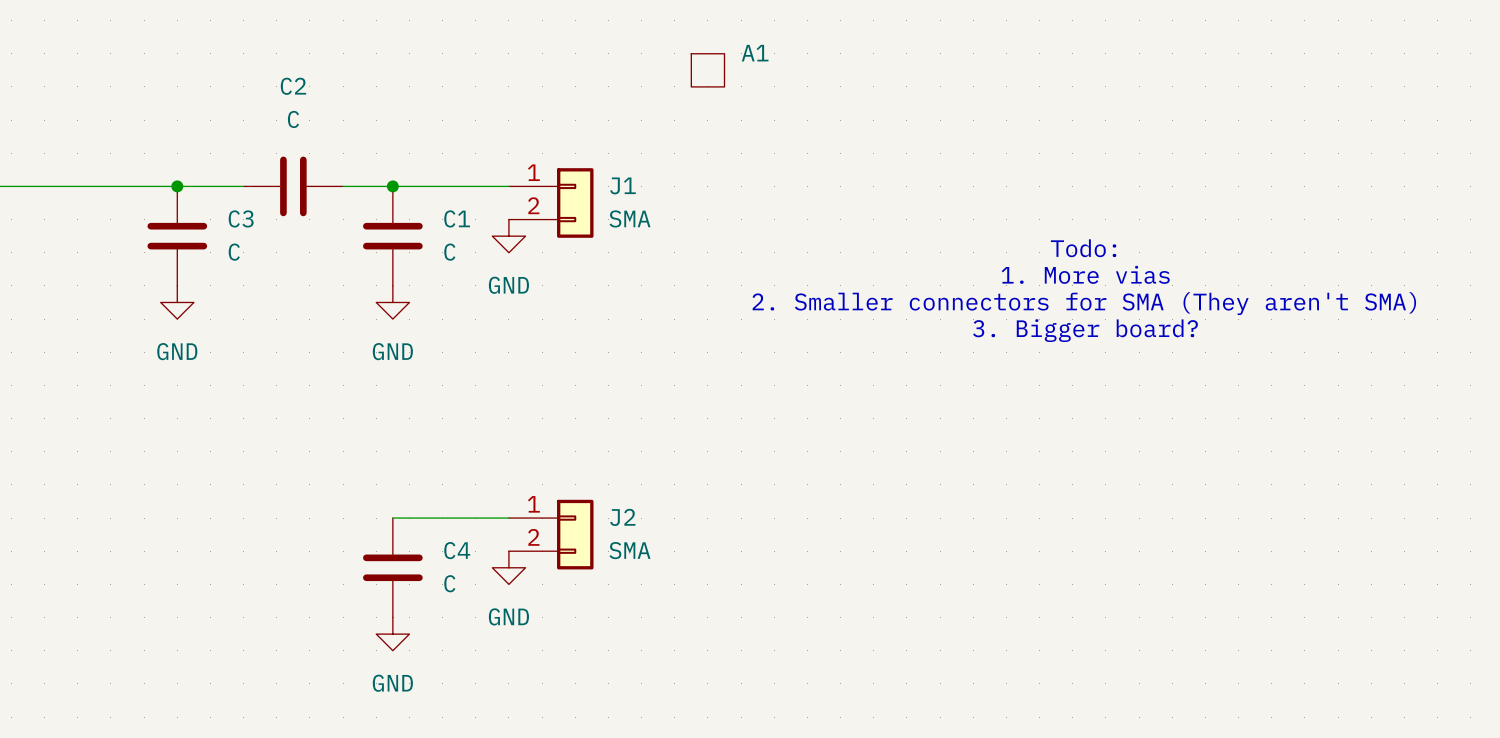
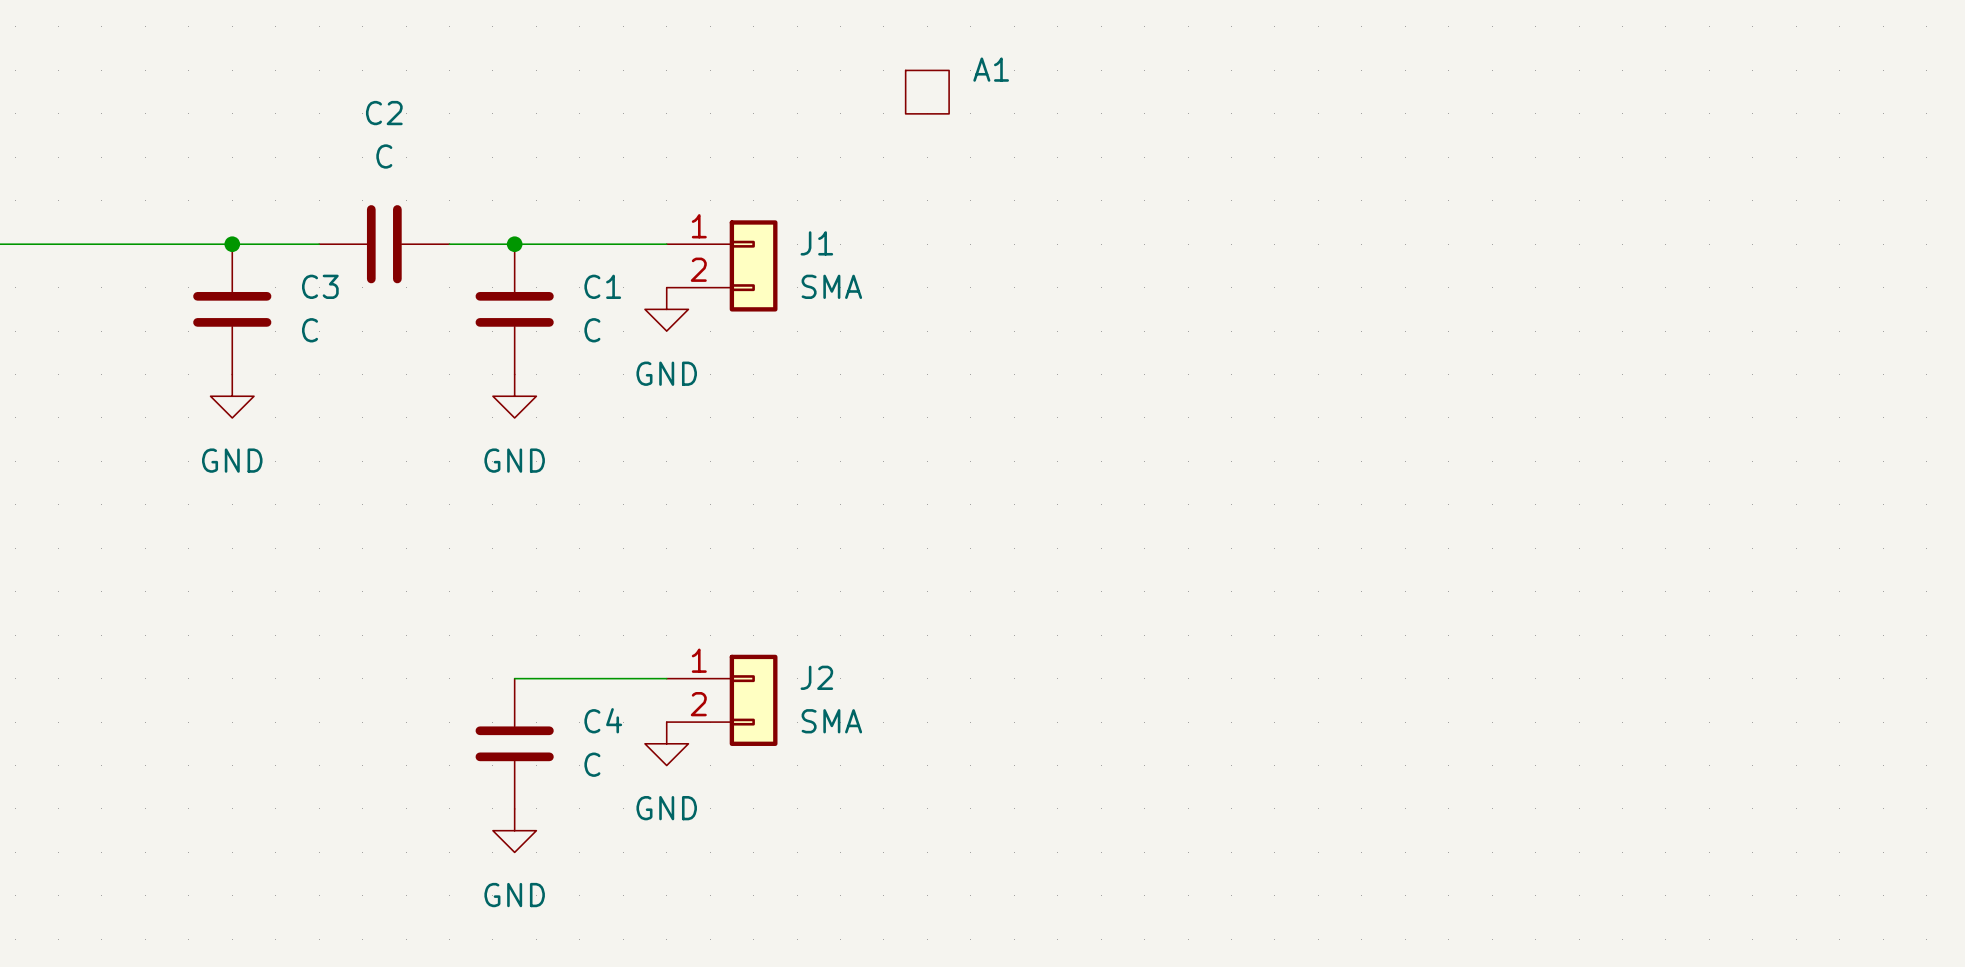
text: Todo: (1083, 248) -> none
text: 1. More vias (1085, 274) -> none
text: 2. Smaller connectors for SMA (They aren't SMA) (1084, 303) -> none
text: 3. Bigger board? (1085, 330) -> none

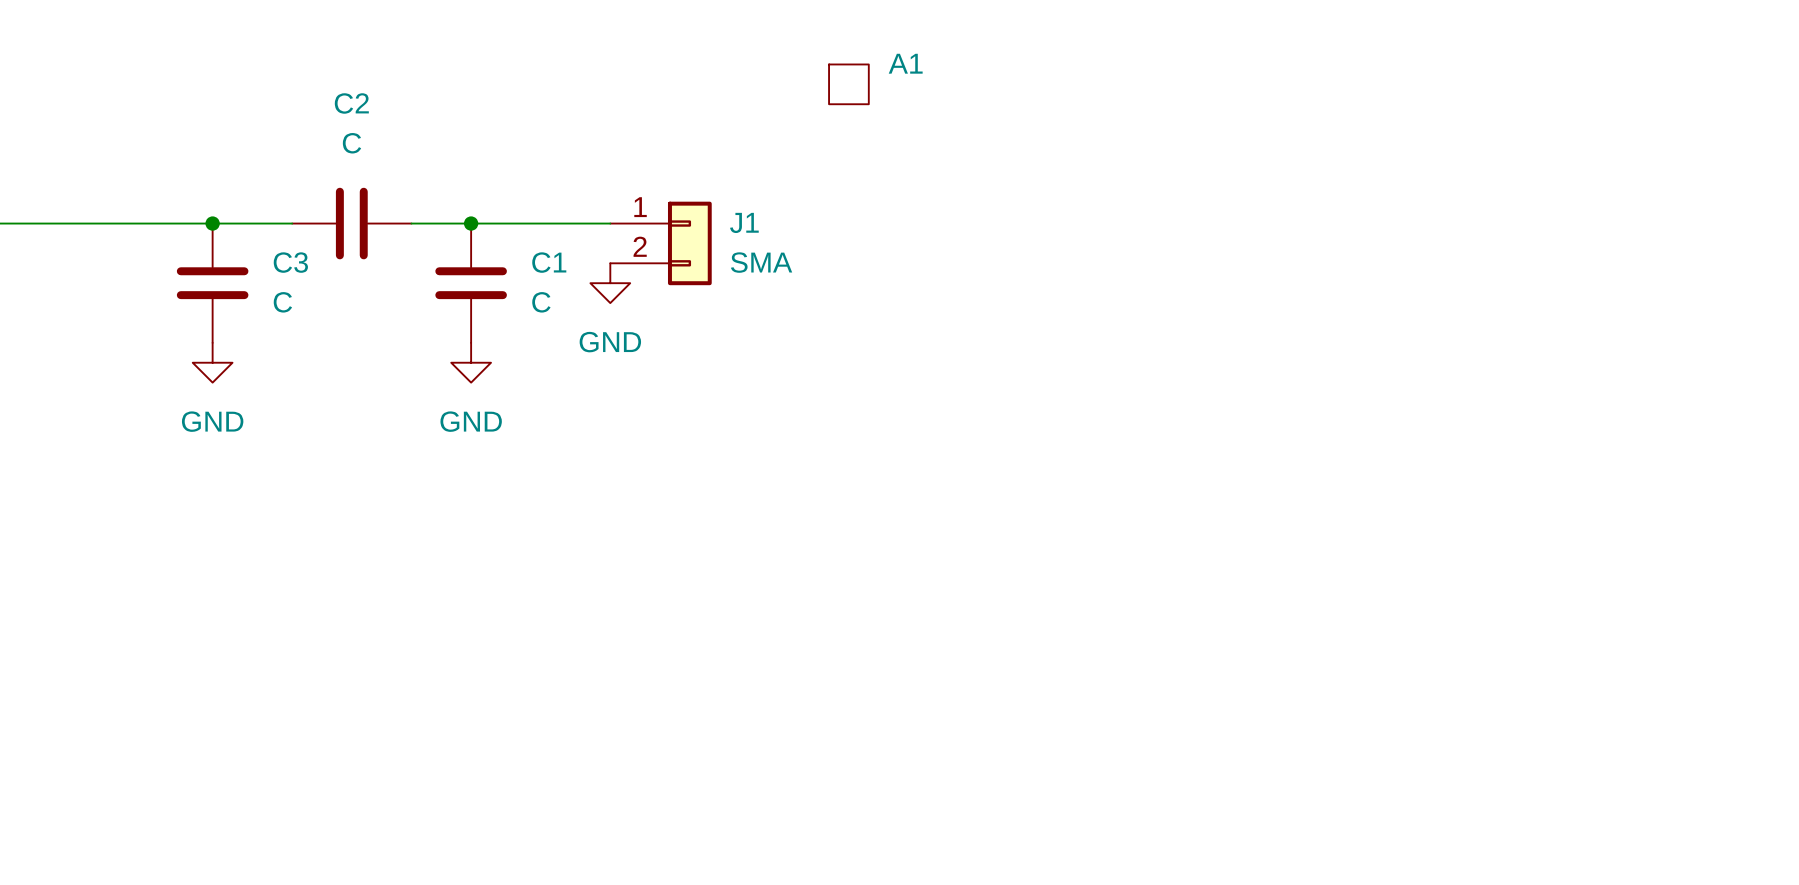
wire: (514, 678) (666, 678) -> none
J2: SMA (722, 700) -> none
C4: C (514, 743) -> none
power symbol: GND (666, 743) -> none
power symbol: GND (514, 830) -> none

